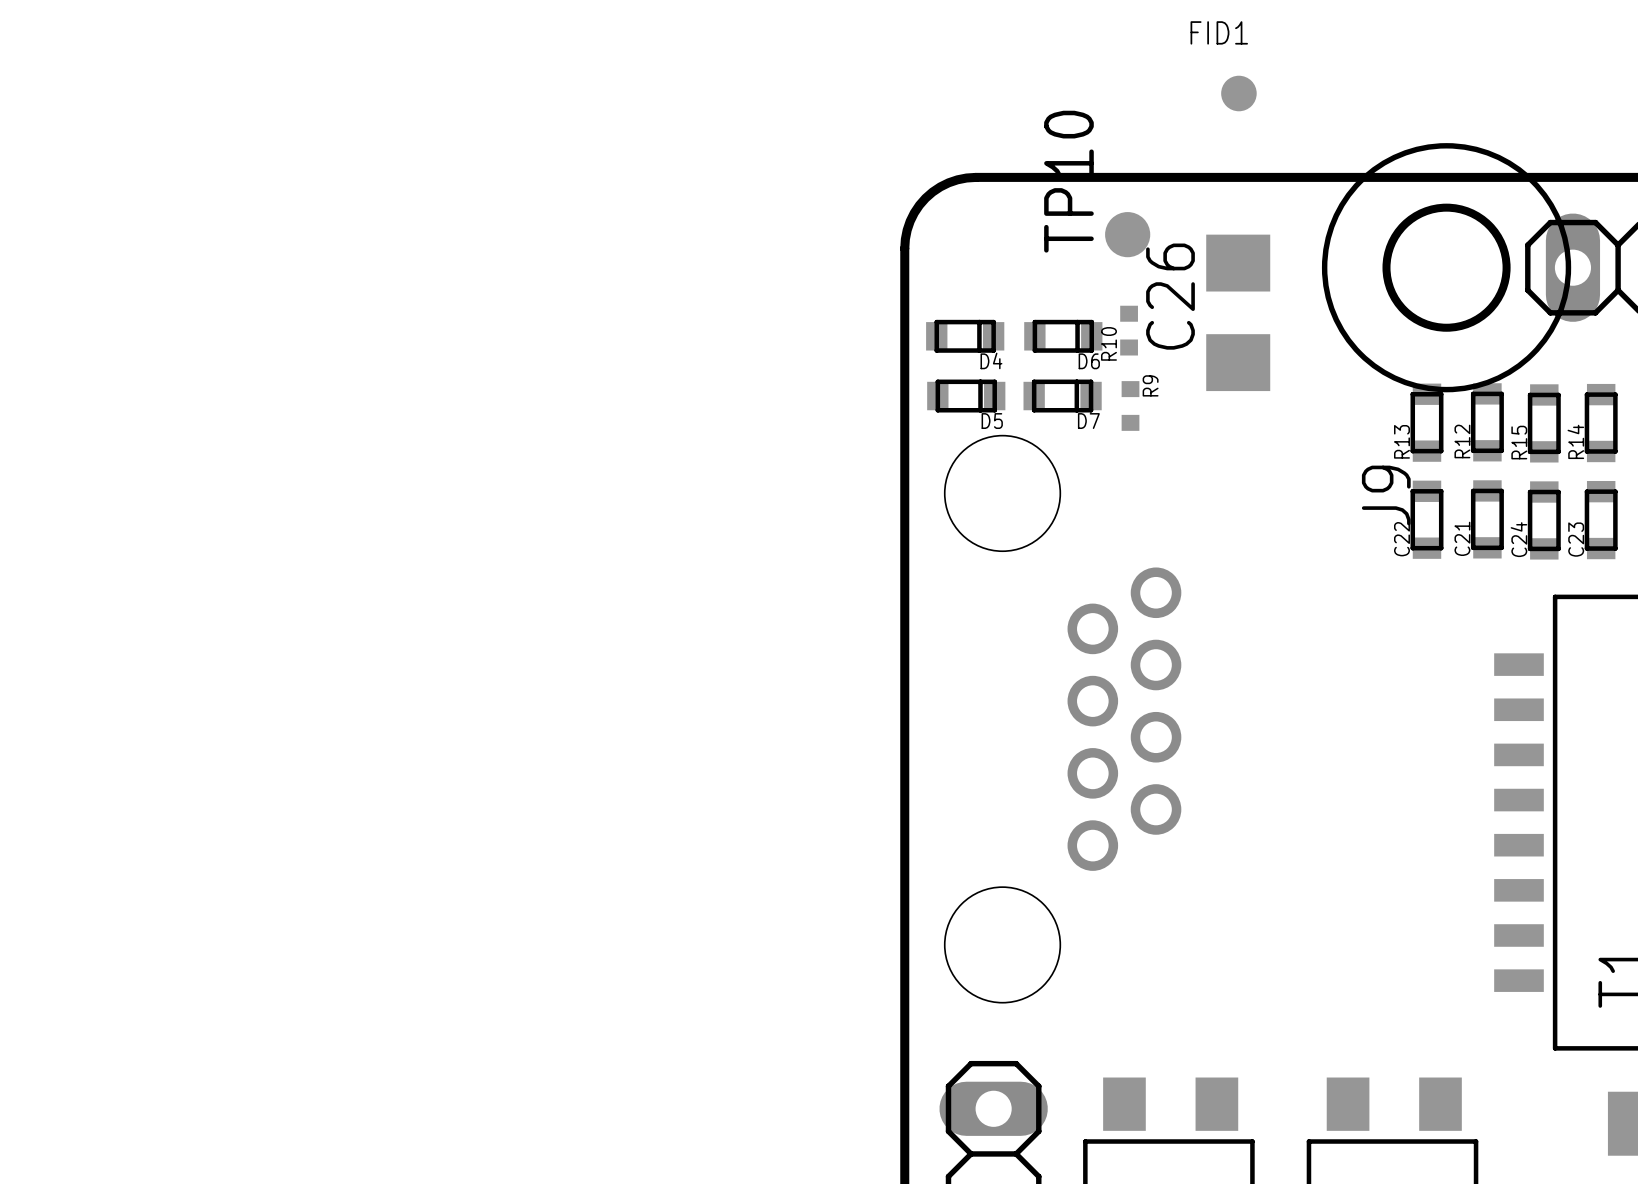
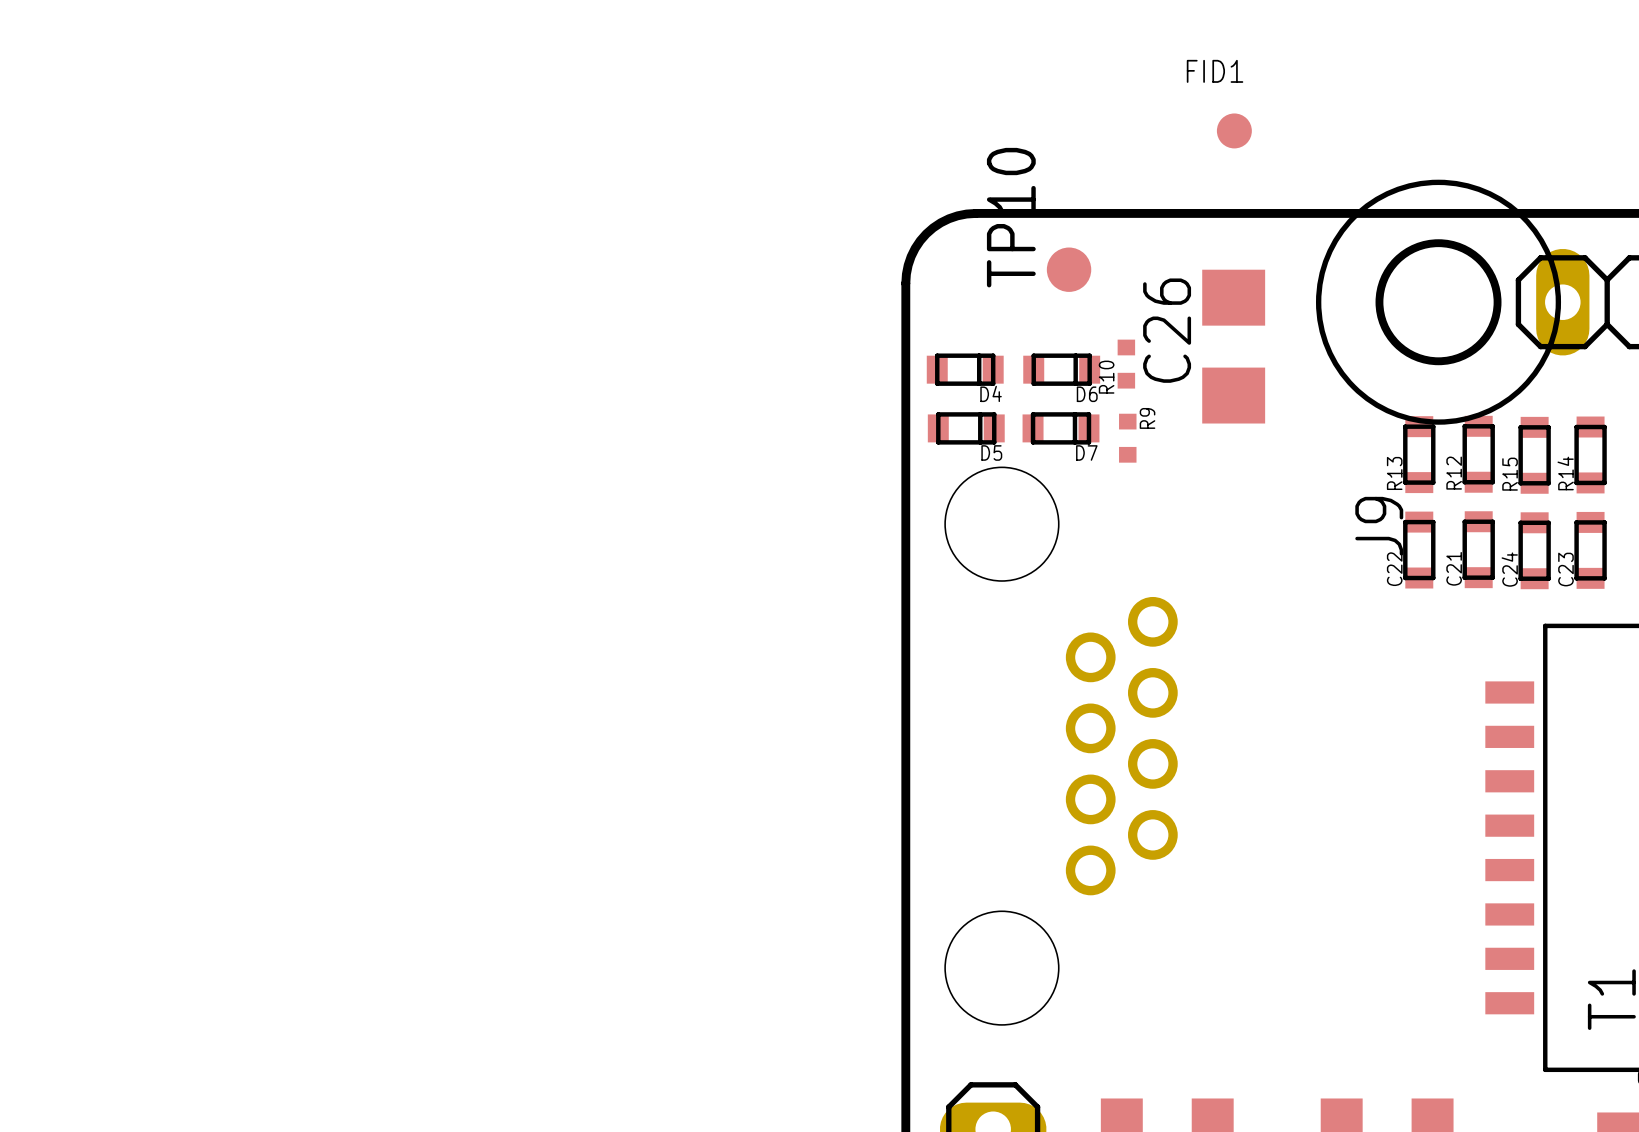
TP10 position: (1127, 234) -> (1069, 269)

